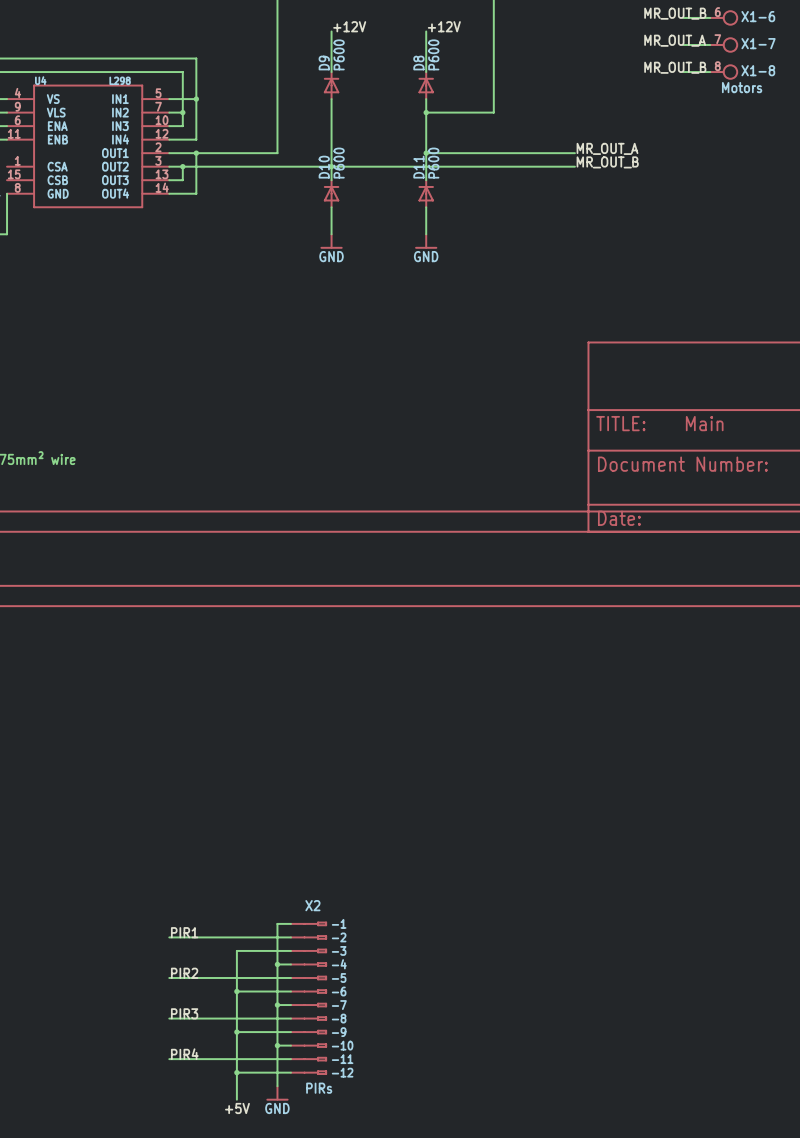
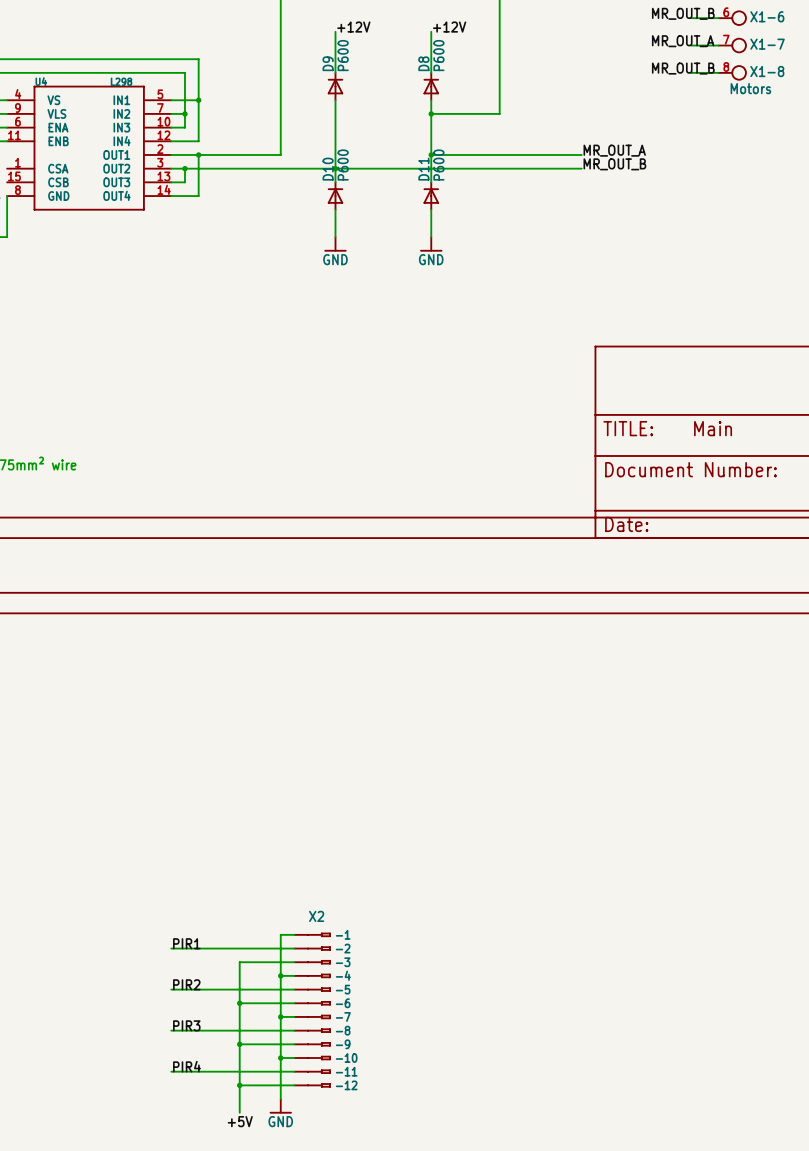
X2 value: PIRs (319, 1088) -> none

